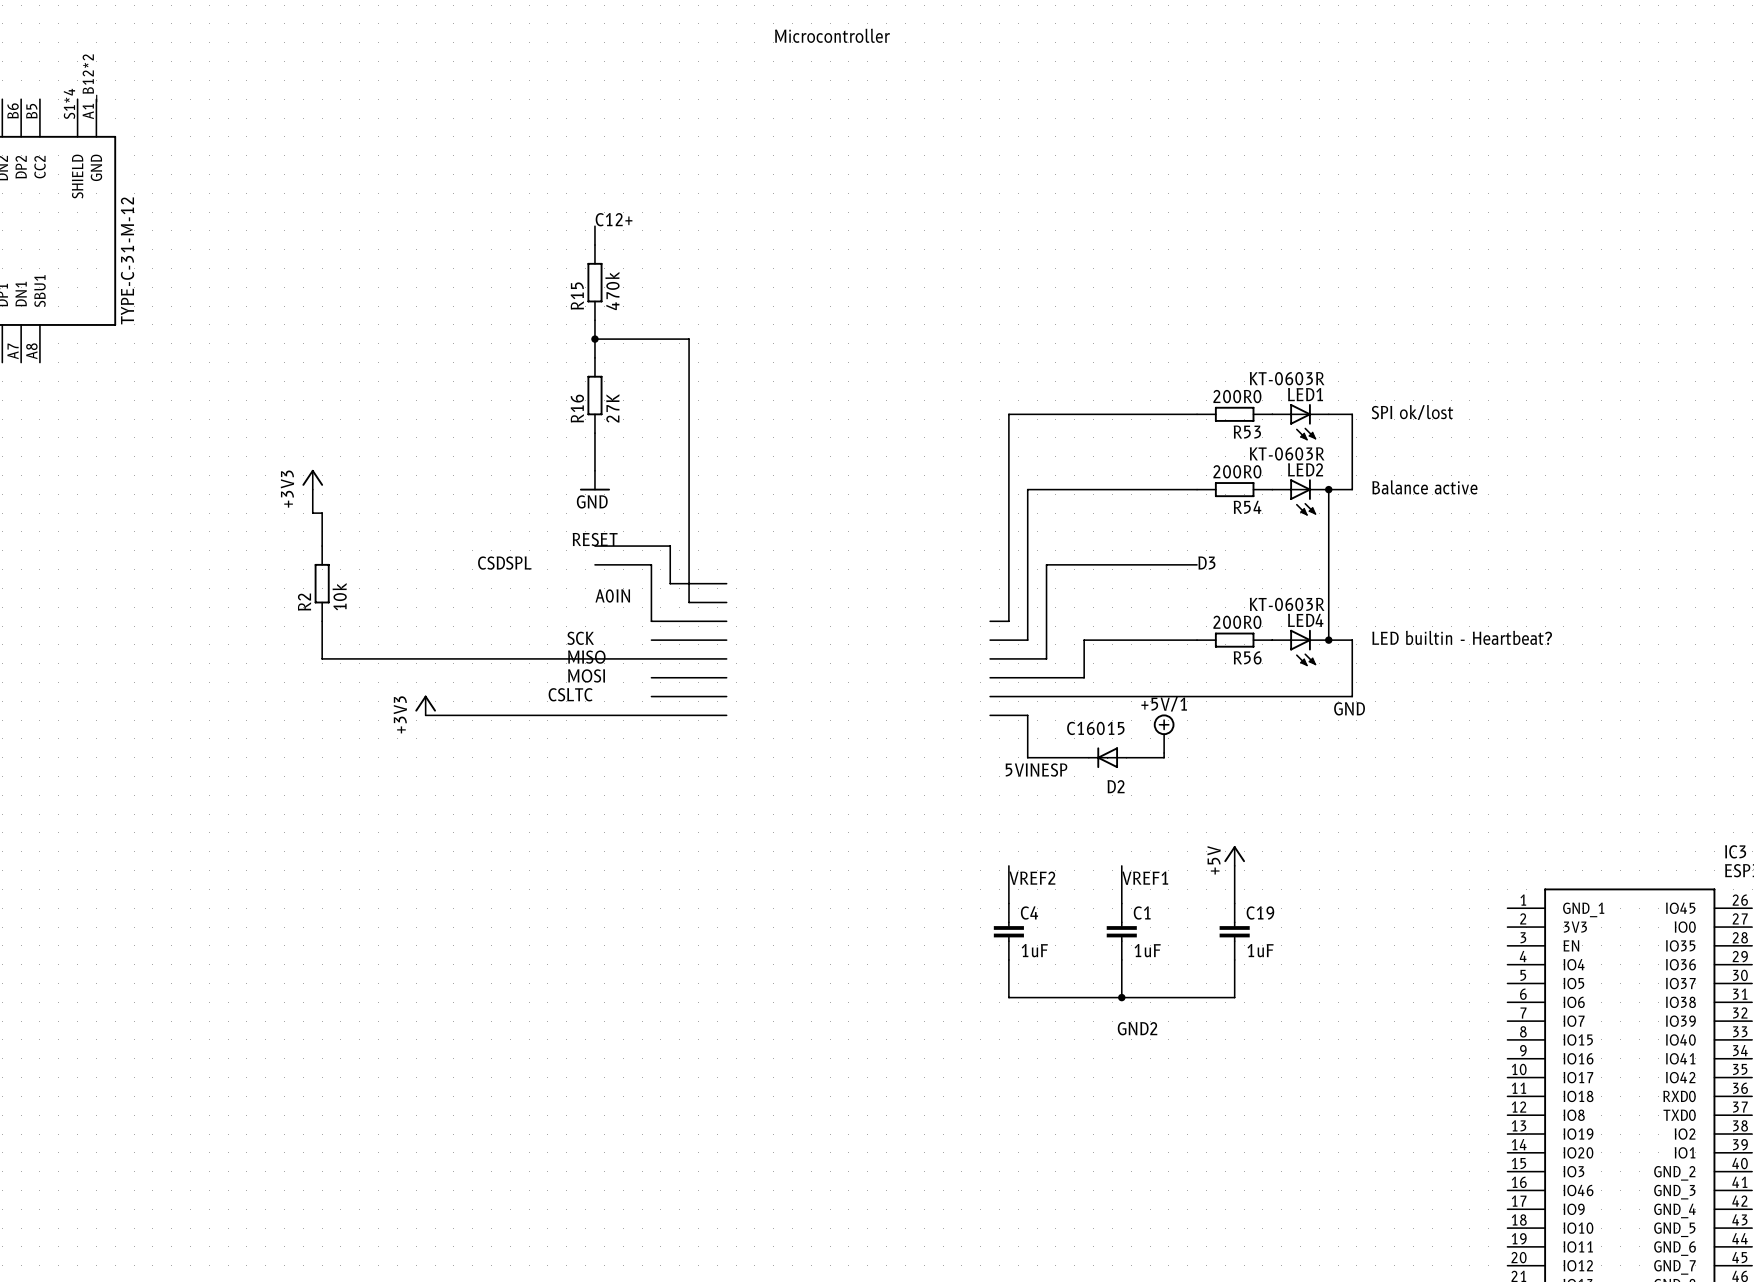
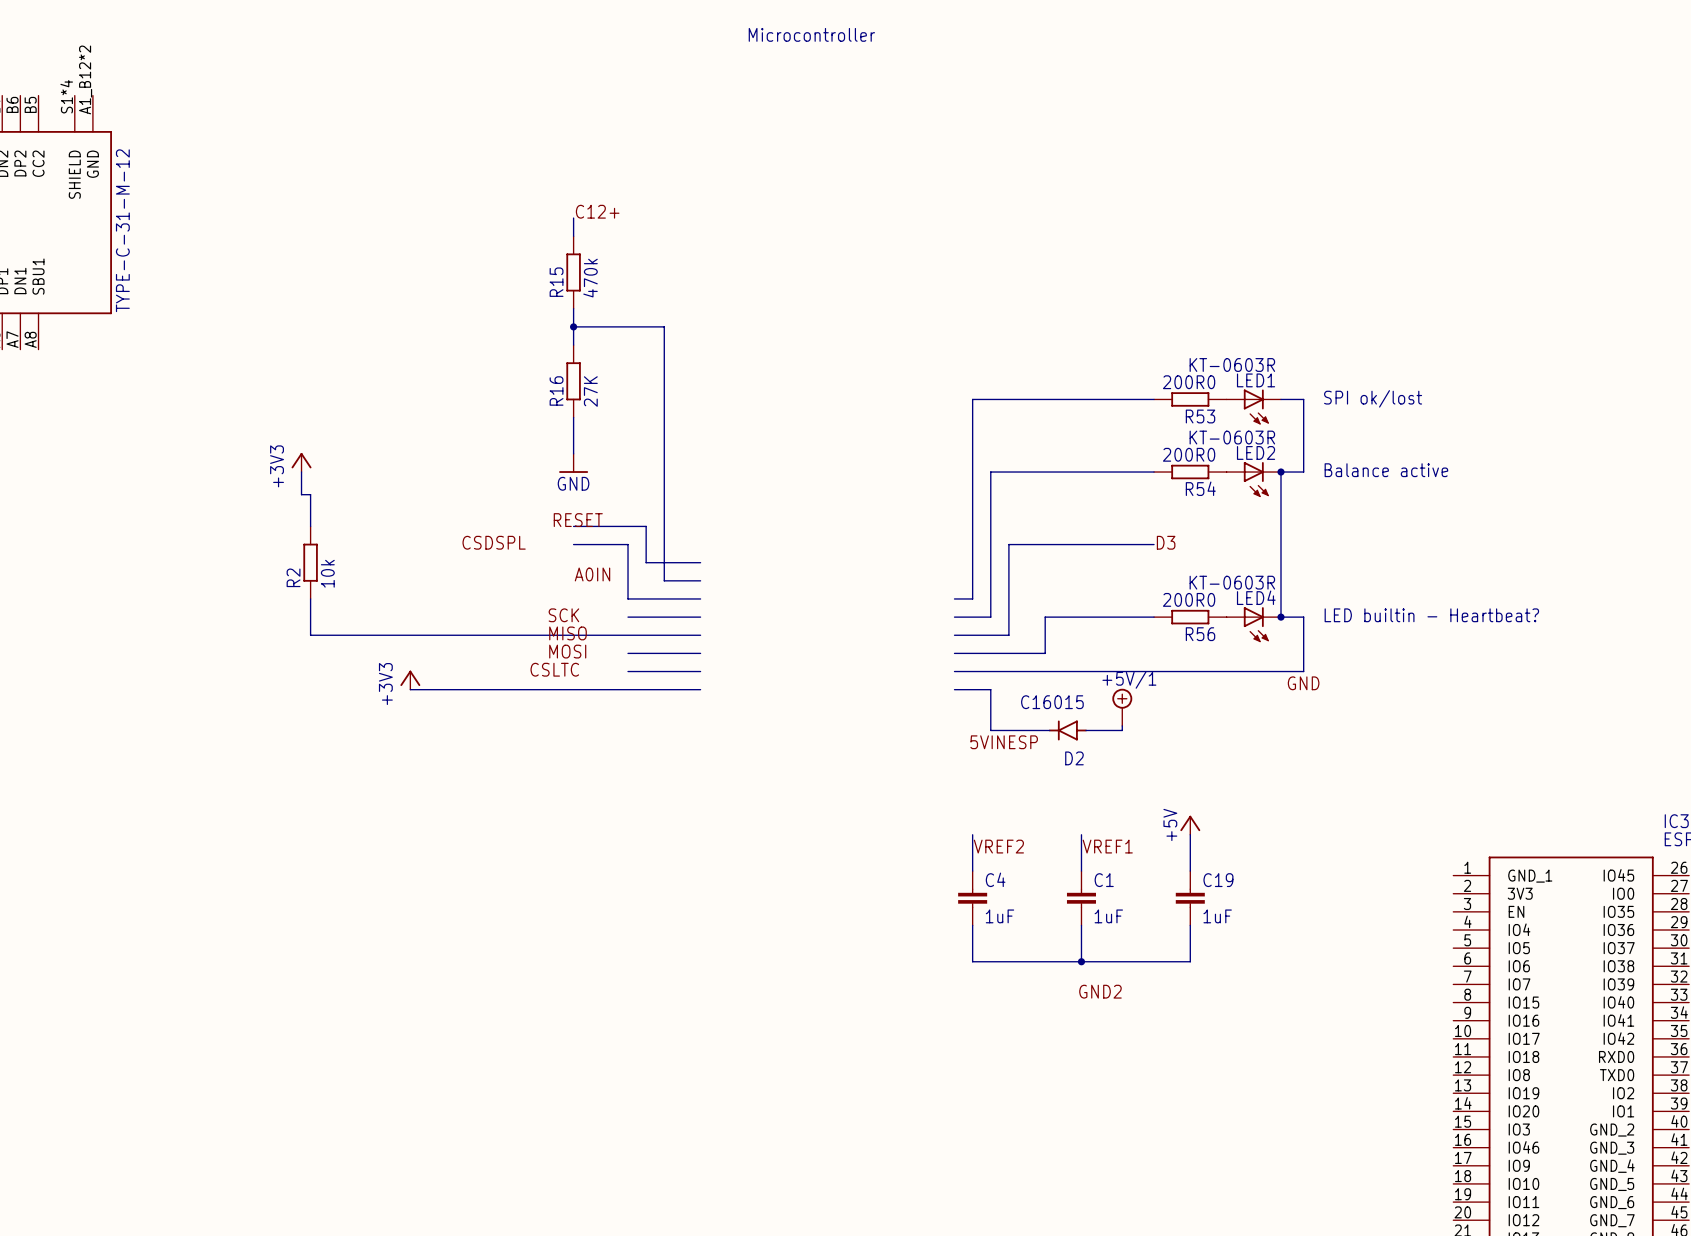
D2 symbol: [1088, 747, 1127, 769] -> [1048, 720, 1087, 741]

